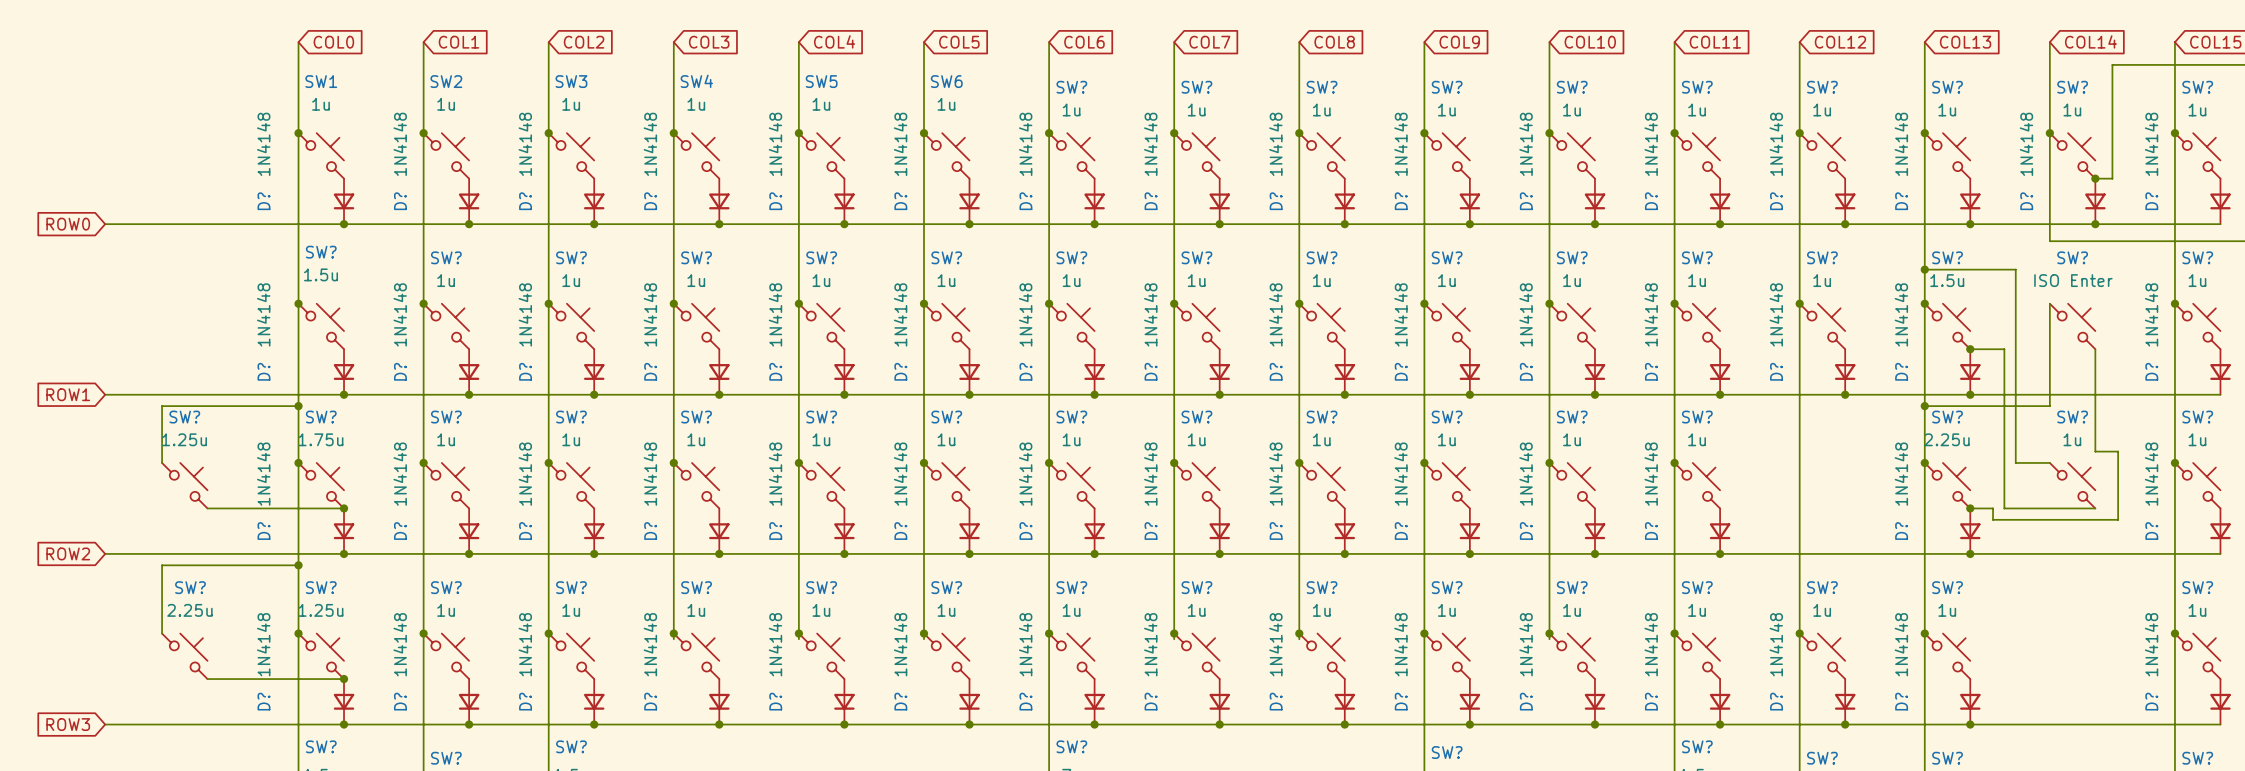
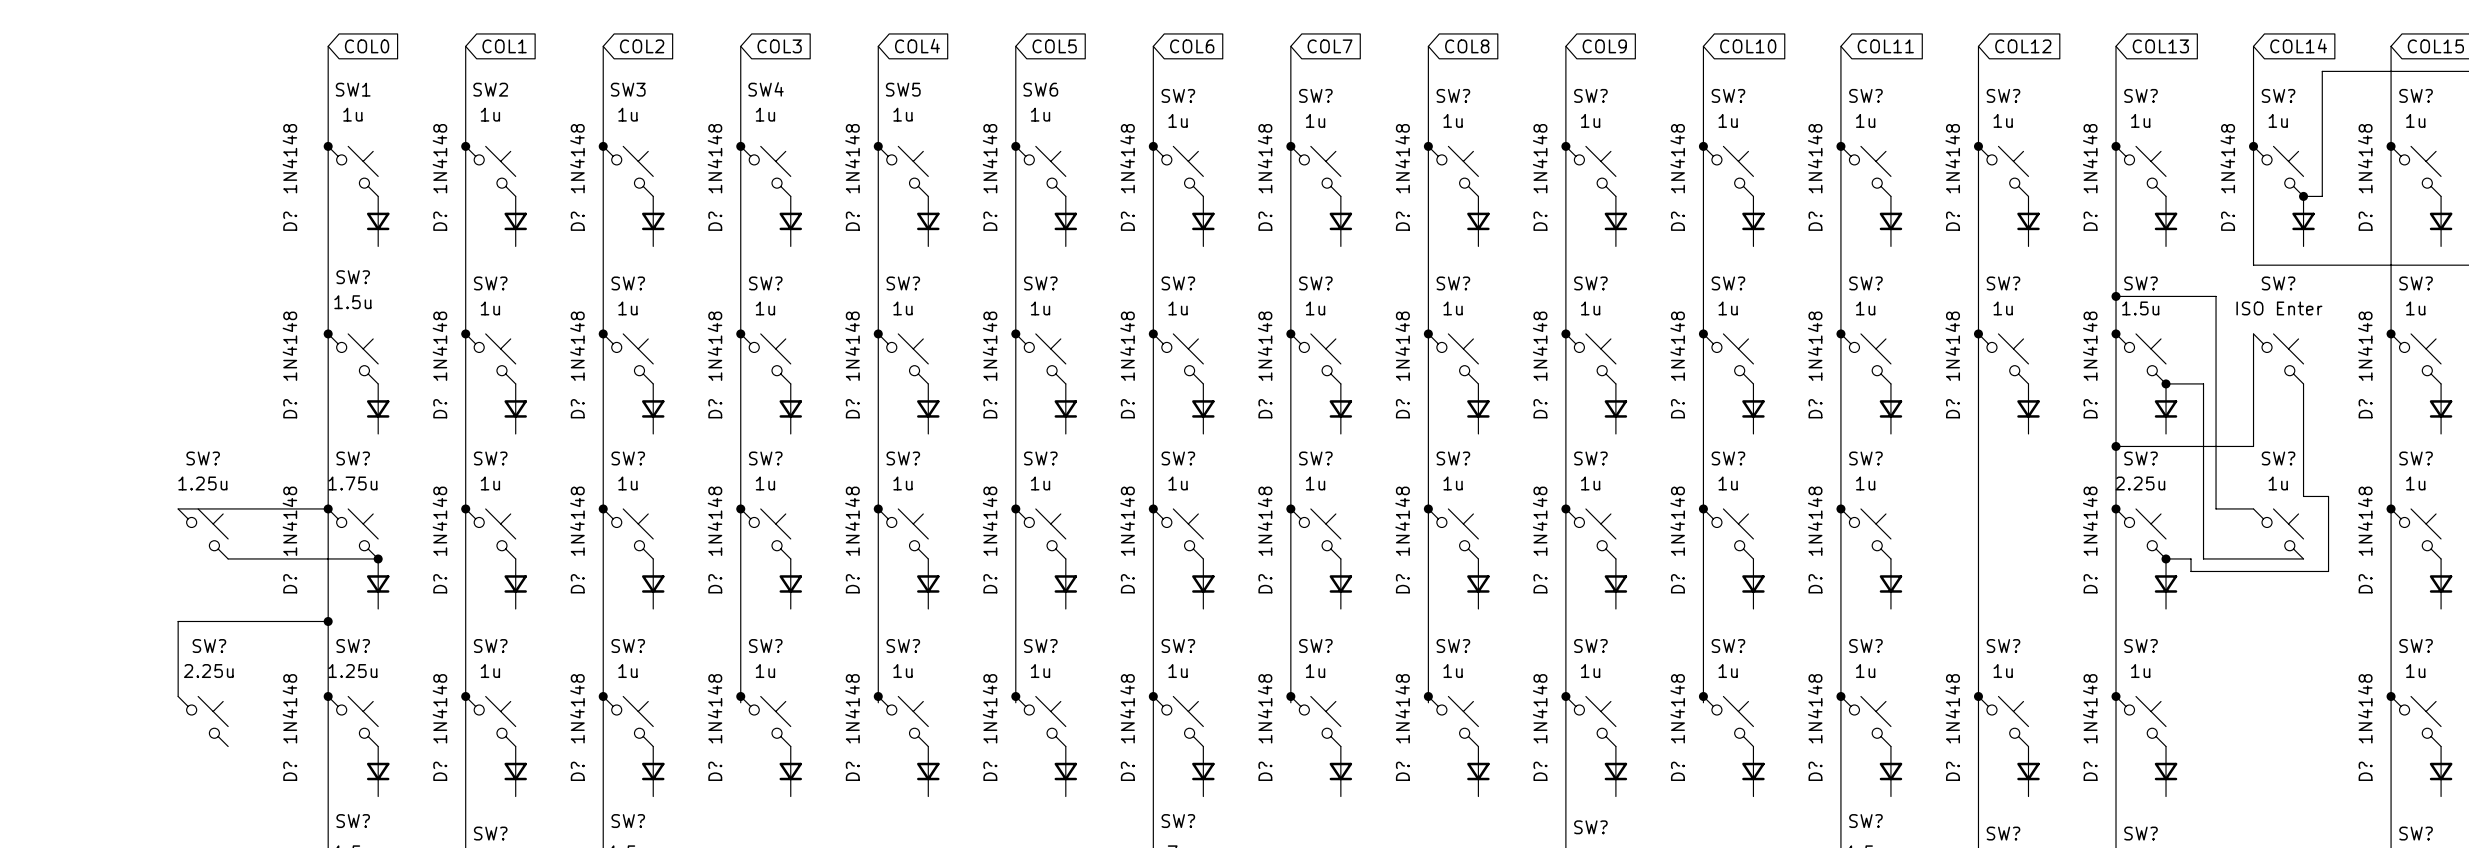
global label: ROW0 (68, 224) -> none
wire: (105, 224) (2220, 224) -> none
junction: (344, 224) -> none
junction: (469, 224) -> none
junction: (594, 224) -> none
junction: (719, 224) -> none
junction: (844, 224) -> none
junction: (969, 224) -> none
junction: (1094, 224) -> none
junction: (1219, 224) -> none
junction: (1344, 224) -> none
junction: (1469, 224) -> none
junction: (1594, 224) -> none
junction: (1720, 224) -> none
junction: (1845, 224) -> none
junction: (1970, 224) -> none
junction: (2095, 224) -> none
global label: ROW1 (68, 394) -> none
wire: (105, 394) (2220, 394) -> none
junction: (344, 394) -> none
junction: (469, 394) -> none
junction: (594, 394) -> none
junction: (719, 394) -> none
junction: (844, 394) -> none
junction: (969, 394) -> none
junction: (1094, 394) -> none
junction: (1219, 394) -> none
junction: (1344, 394) -> none
junction: (1469, 394) -> none
junction: (1594, 394) -> none
junction: (1720, 394) -> none
junction: (1845, 394) -> none
junction: (1970, 394) -> none
wire: (298, 406) (162, 406) (162, 462) -> (328, 508) (178, 508)
junction: (298, 406) -> none
global label: ROW2 (68, 553) -> none
wire: (105, 553) (2220, 553) -> none
junction: (344, 553) -> none
junction: (469, 553) -> none
junction: (594, 553) -> none
junction: (719, 553) -> none
junction: (844, 553) -> none
junction: (969, 553) -> none
junction: (1094, 553) -> none
junction: (1219, 553) -> none
junction: (1344, 553) -> none
junction: (1469, 553) -> none
junction: (1594, 553) -> none
junction: (1720, 553) -> none
junction: (1970, 553) -> none
wire: (207, 679) (344, 679) -> none
junction: (344, 679) -> none
global label: ROW3 (68, 724) -> none
wire: (105, 724) (2220, 724) -> none
junction: (344, 724) -> none
junction: (469, 724) -> none
junction: (594, 724) -> none
junction: (719, 724) -> none
junction: (844, 724) -> none
junction: (969, 724) -> none
junction: (1094, 724) -> none
junction: (1219, 724) -> none
junction: (1344, 724) -> none
junction: (1469, 724) -> none
junction: (1594, 724) -> none
junction: (1720, 724) -> none
junction: (1845, 724) -> none
junction: (1970, 724) -> none

